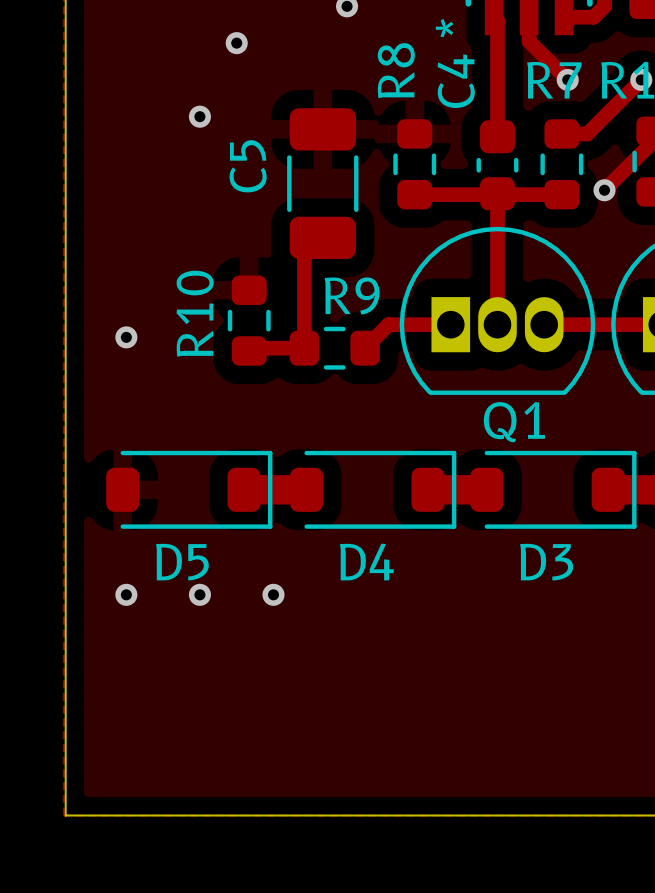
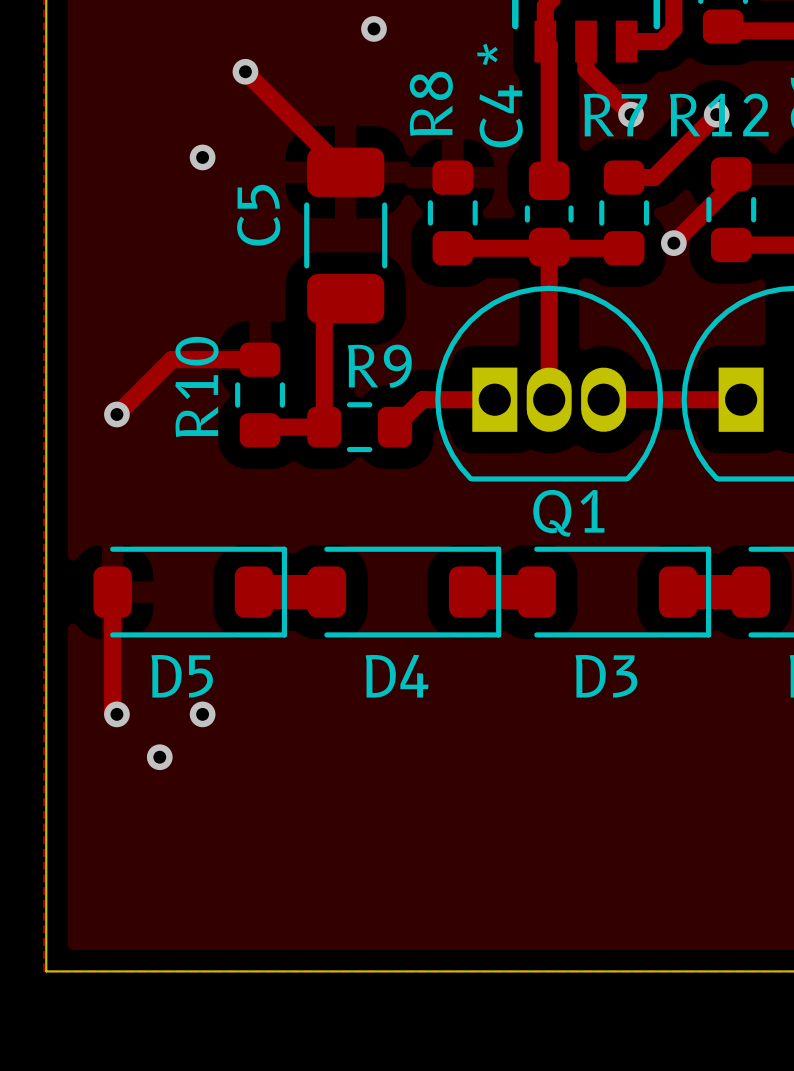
track: none -> (245, 71) (345, 172)
track: none -> (260, 359) (171, 359) (116, 414)
track: none -> (112, 592) (112, 710) (116, 714)
via position: (273, 594) -> (159, 757)

